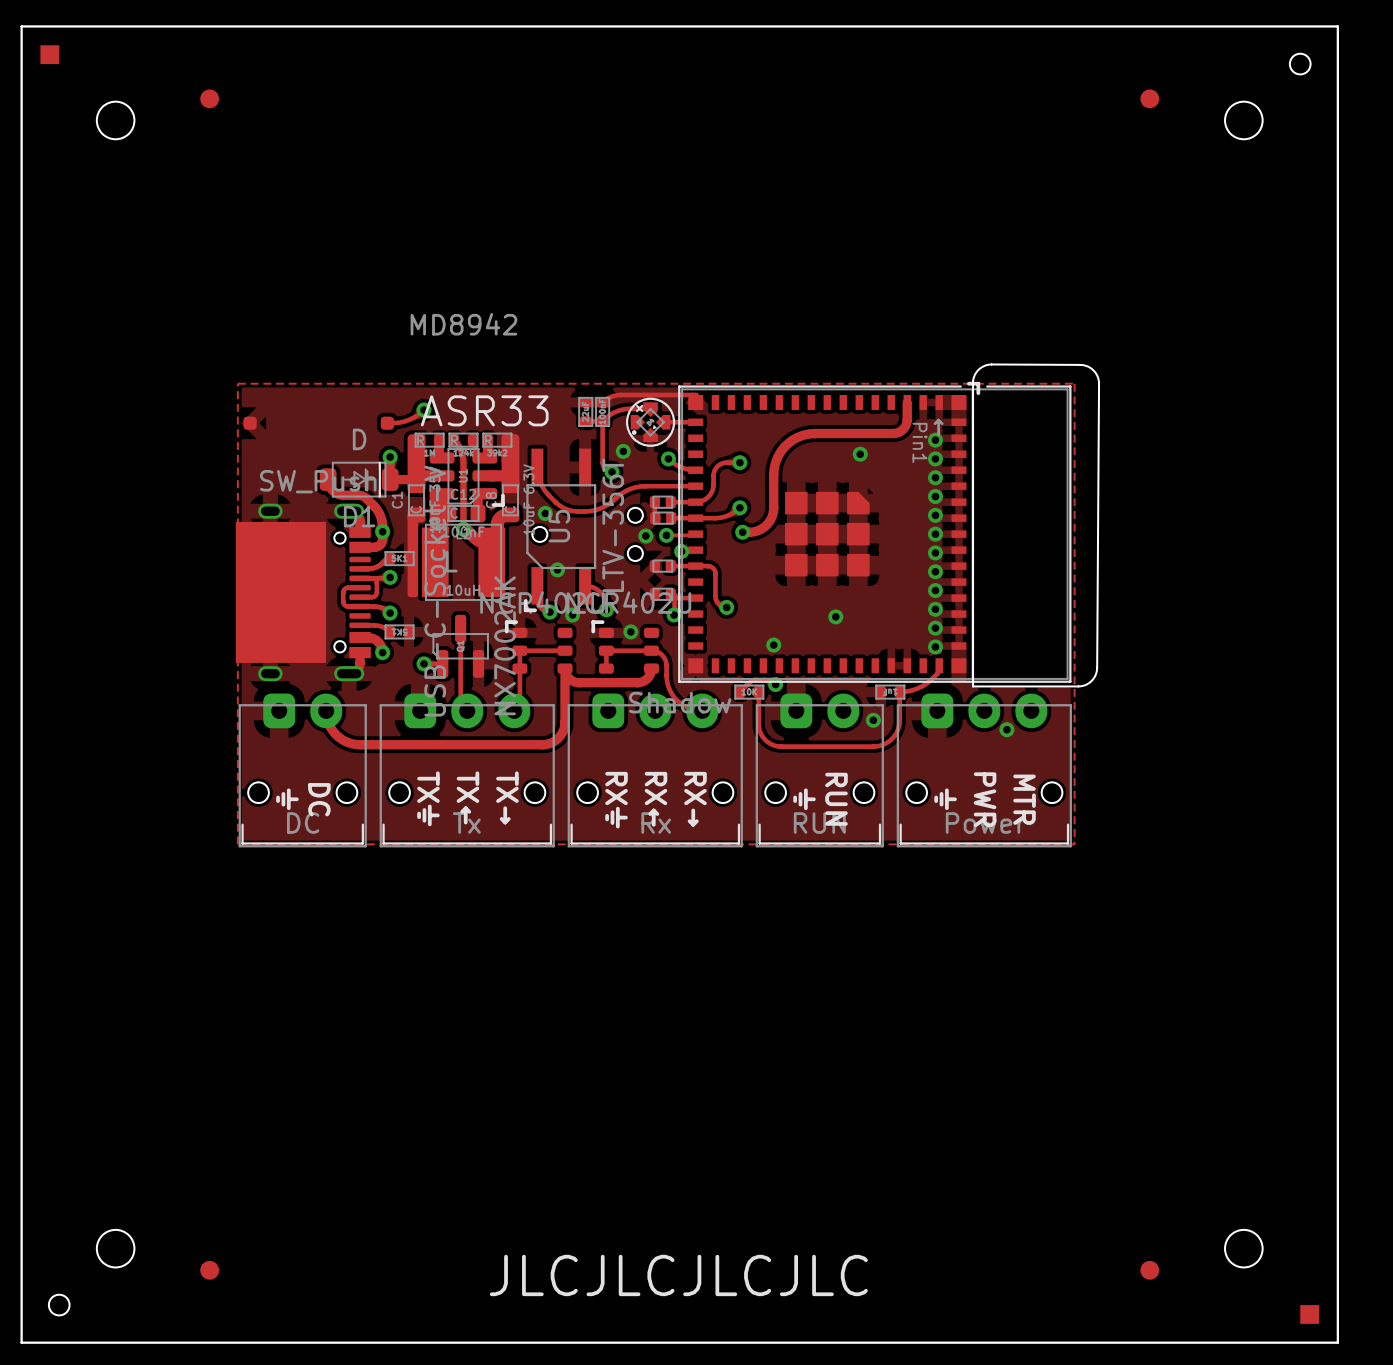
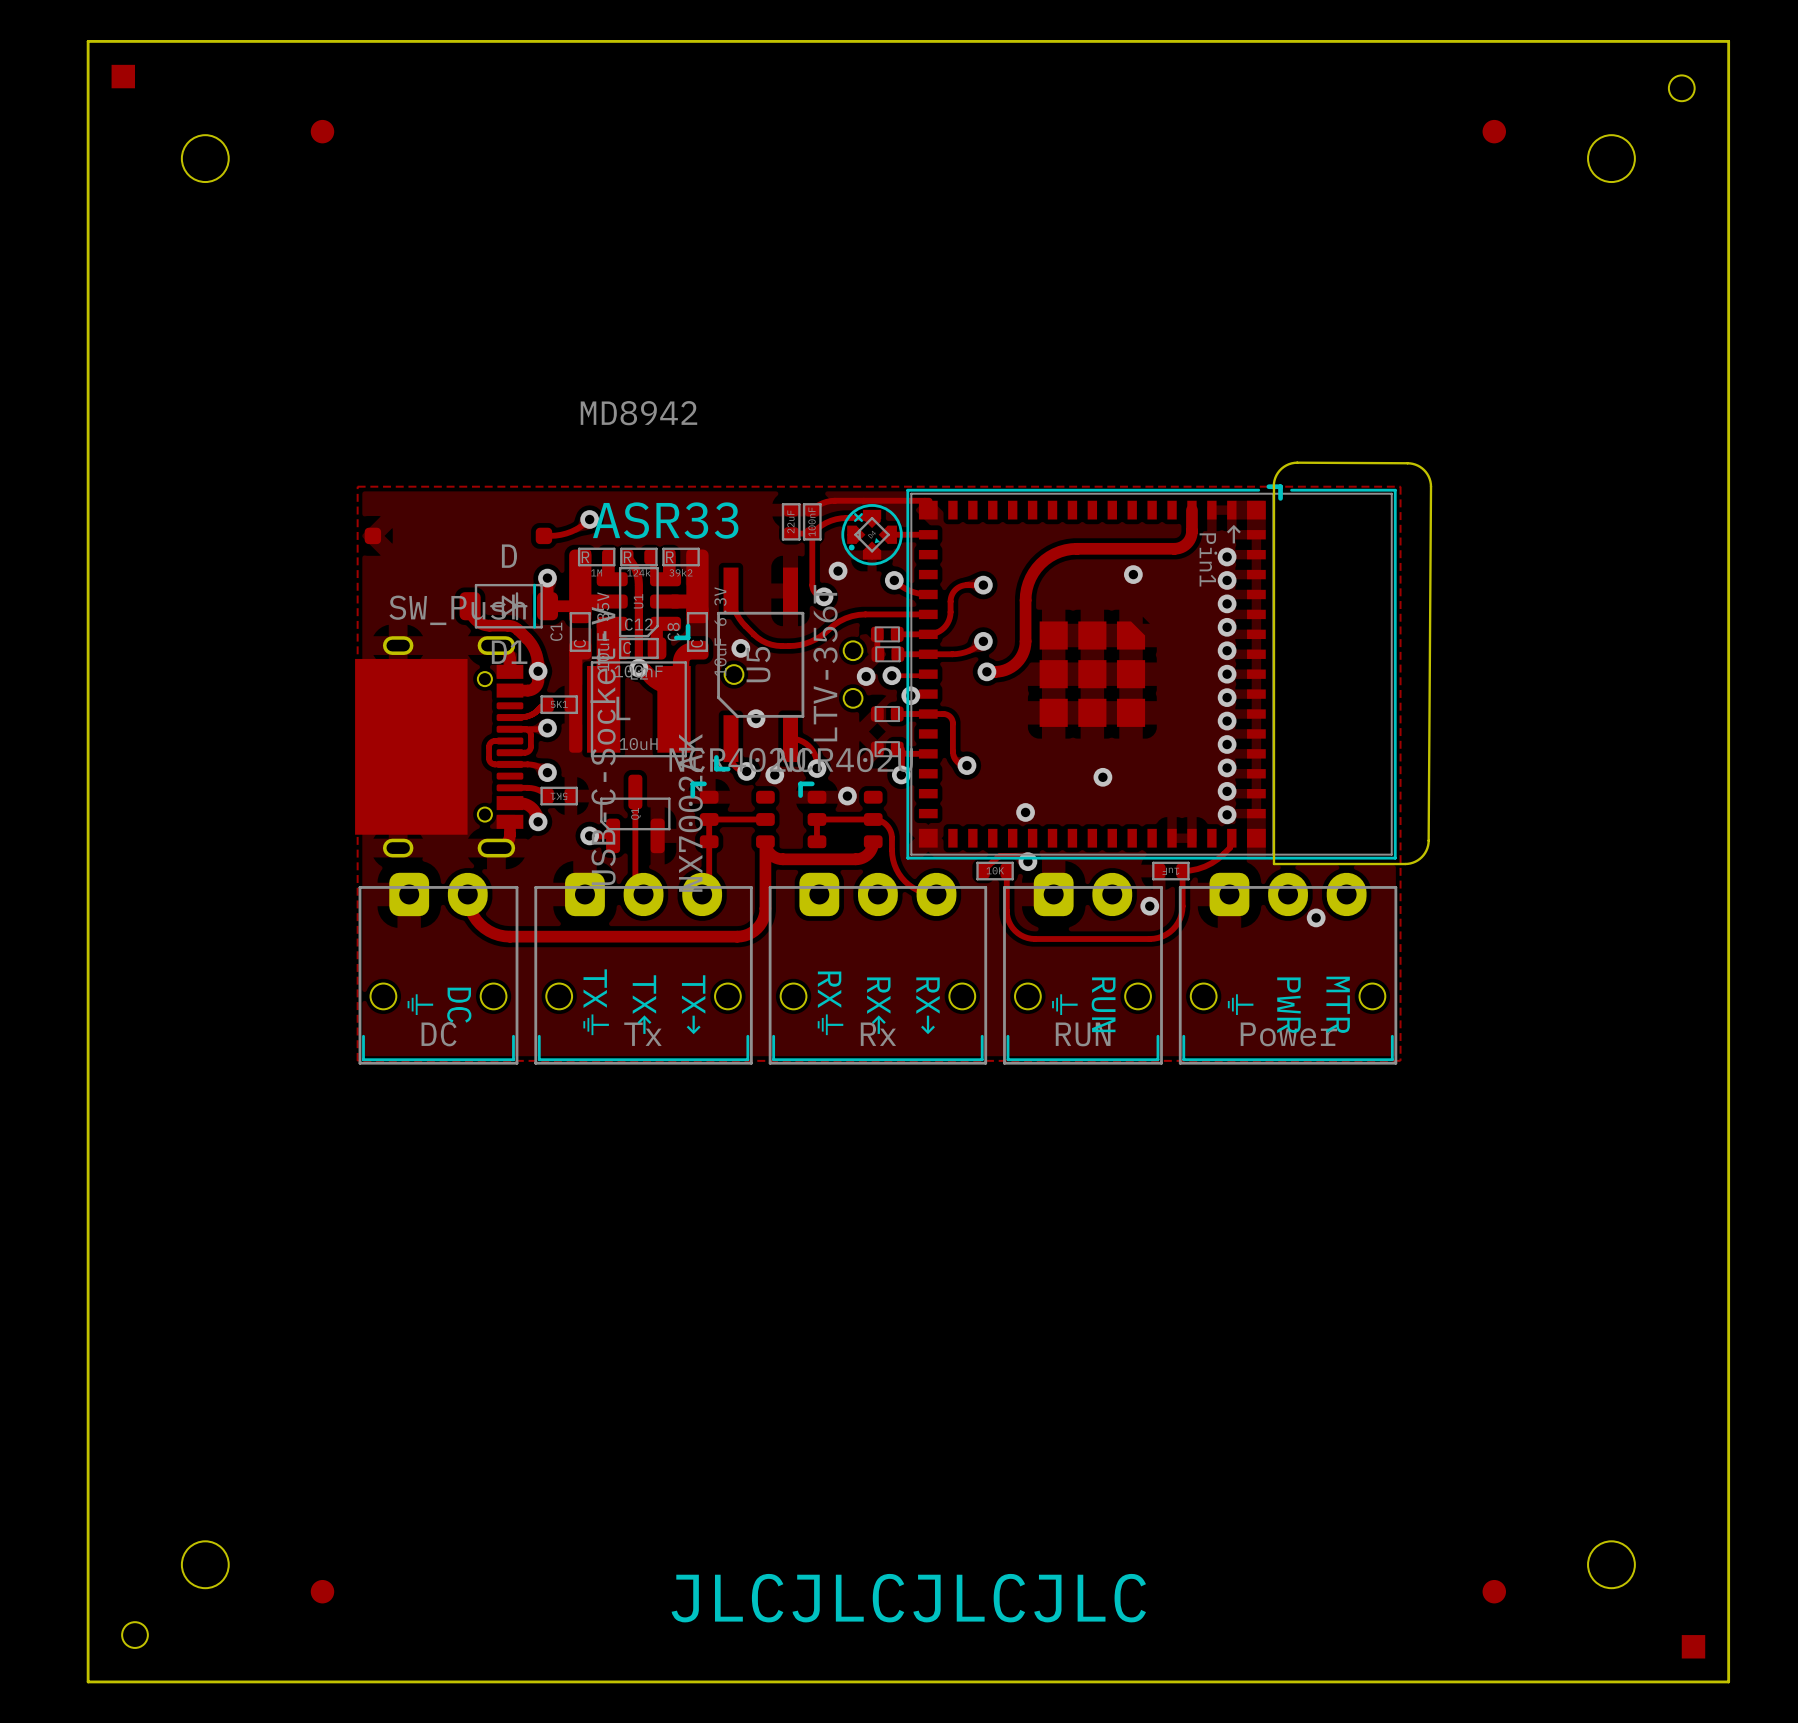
drawing: [629, 691, 732, 714] -> none

